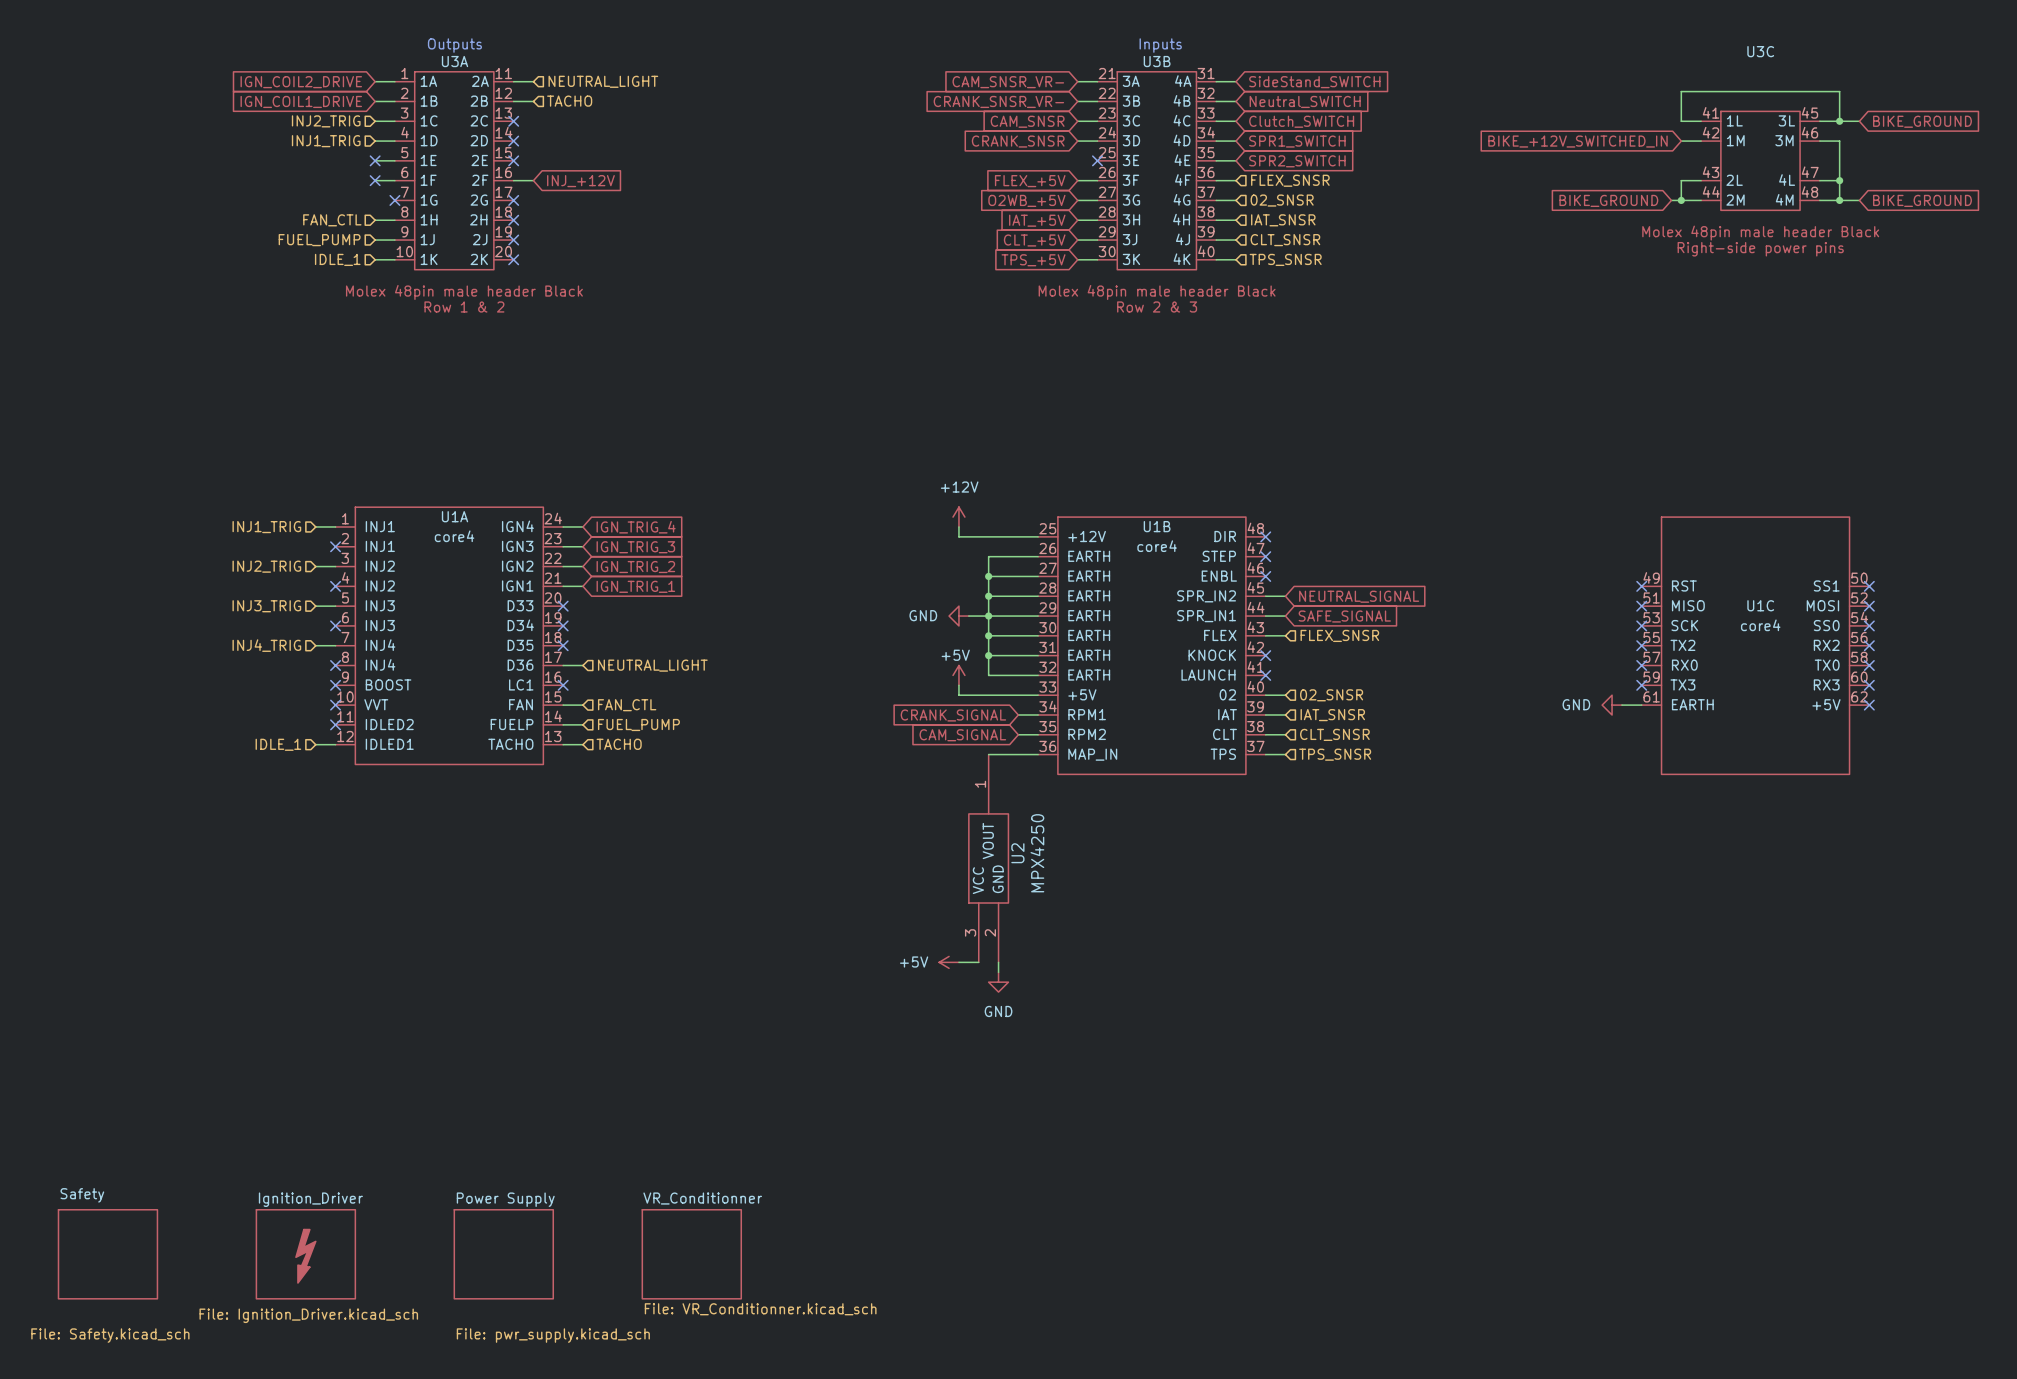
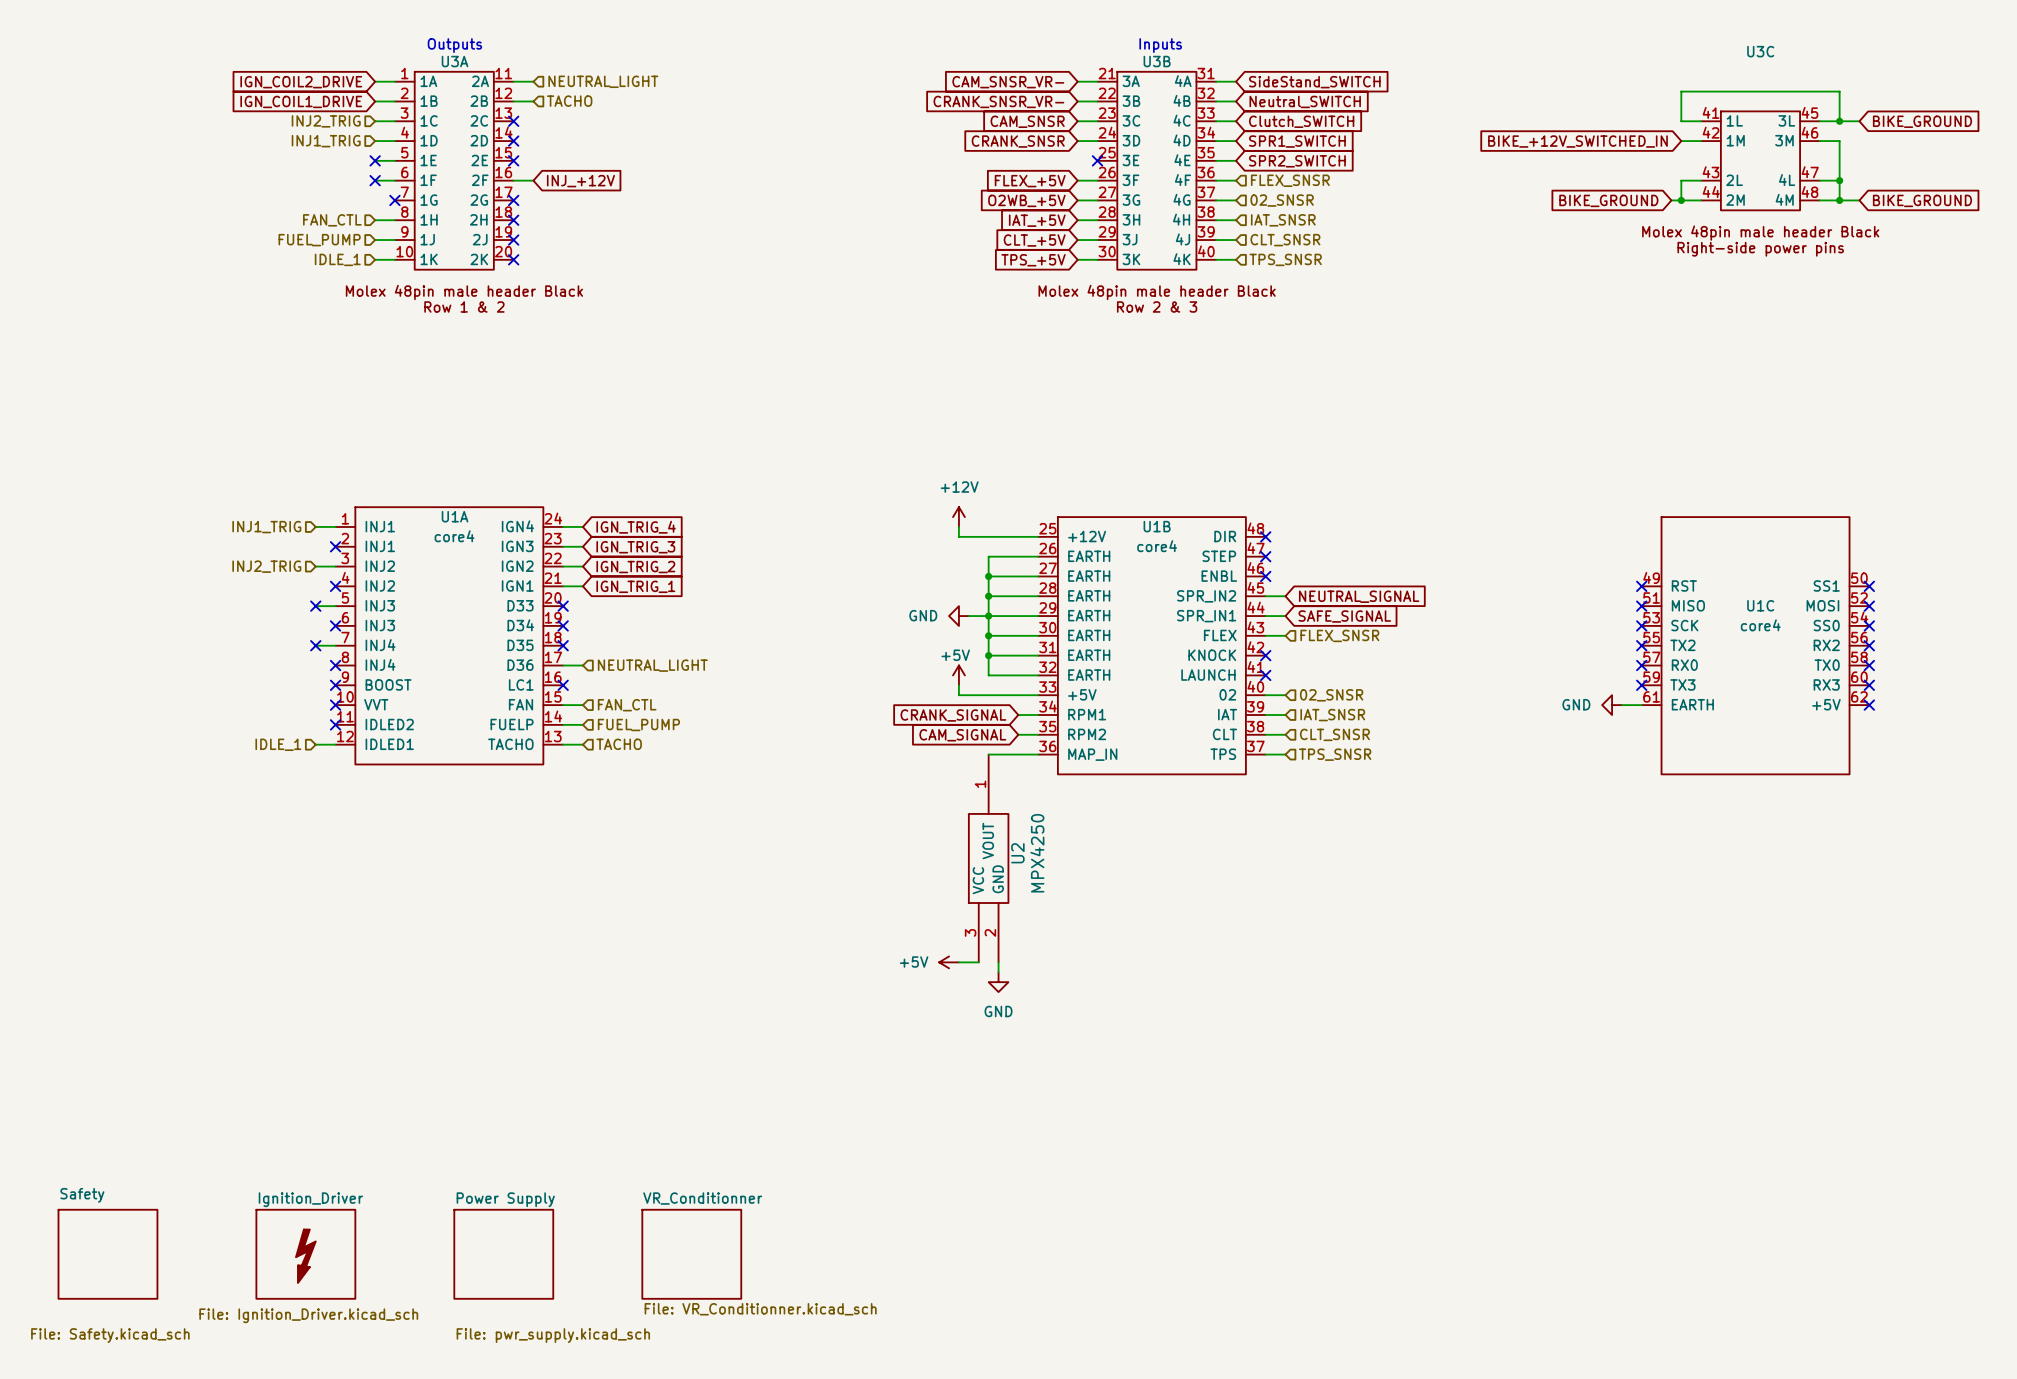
hierarchical label: INJ3_TRIG (266, 606) -> none
no-connect mark: none -> (315, 606)
hierarchical label: INJ4_TRIG (266, 645) -> none
no-connect mark: none -> (315, 645)

